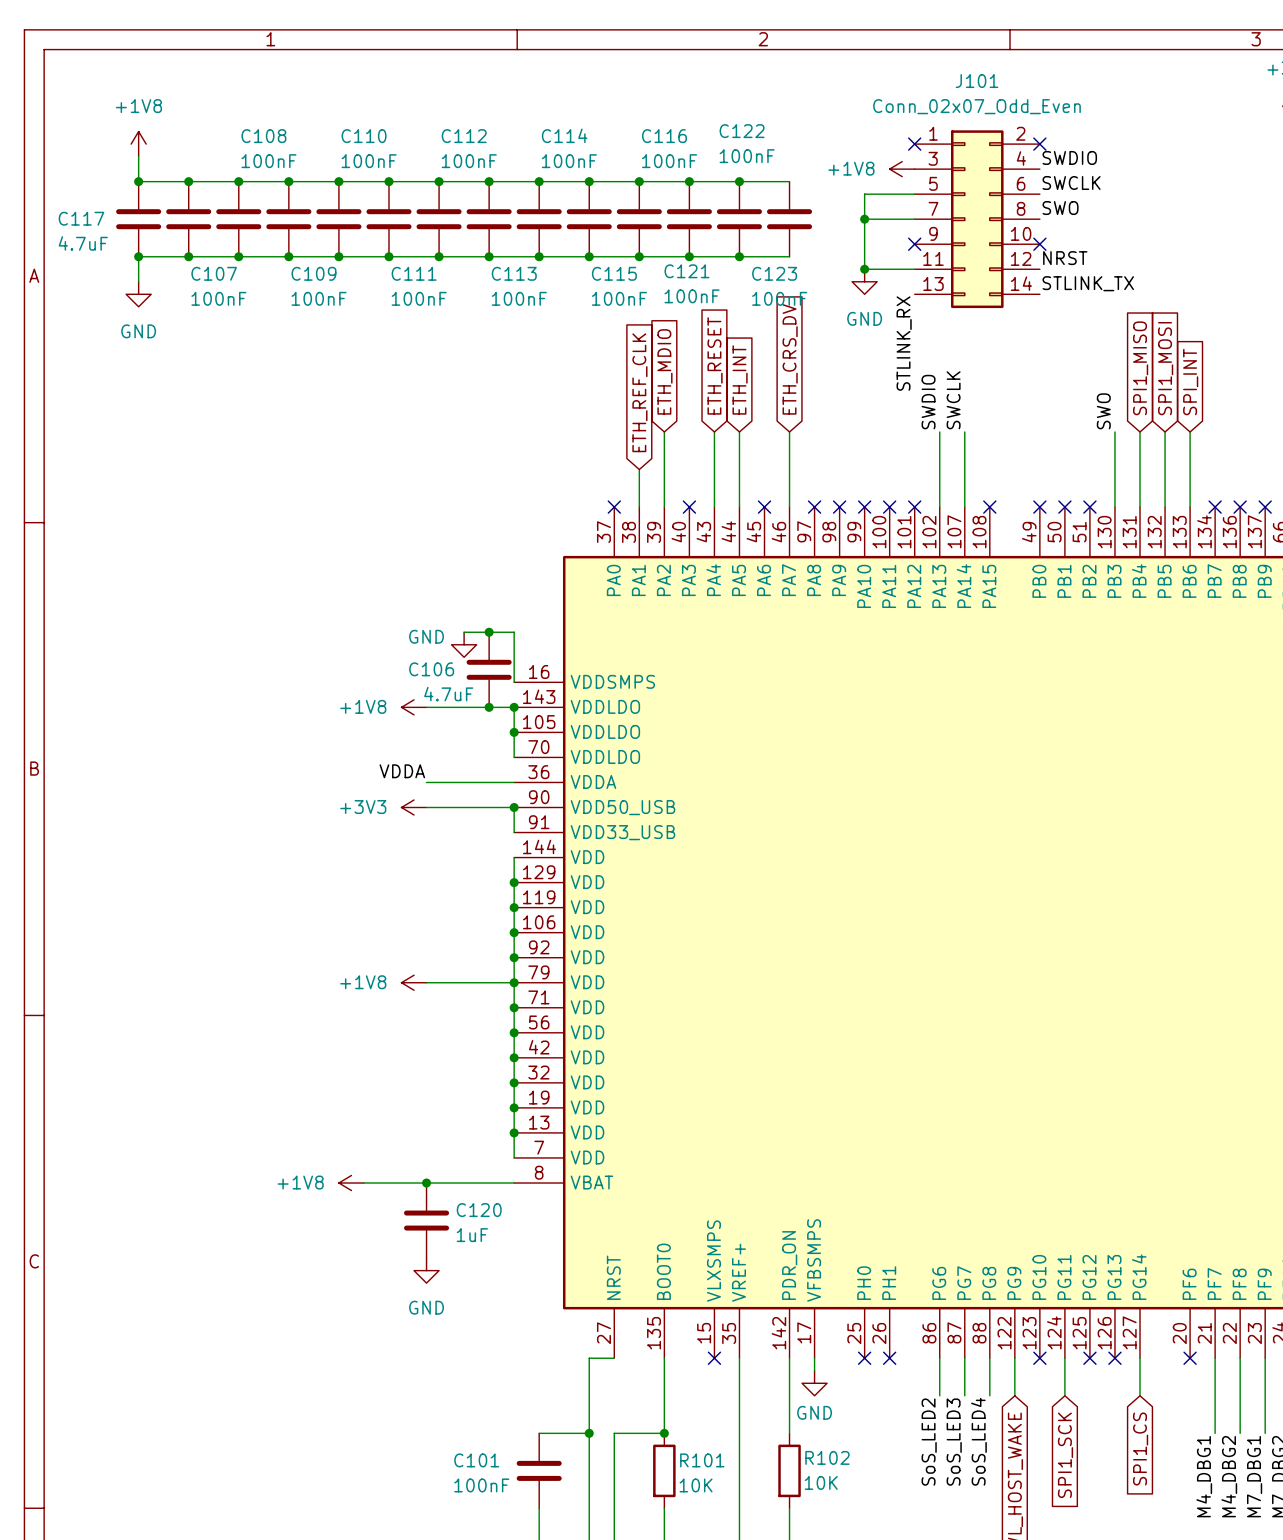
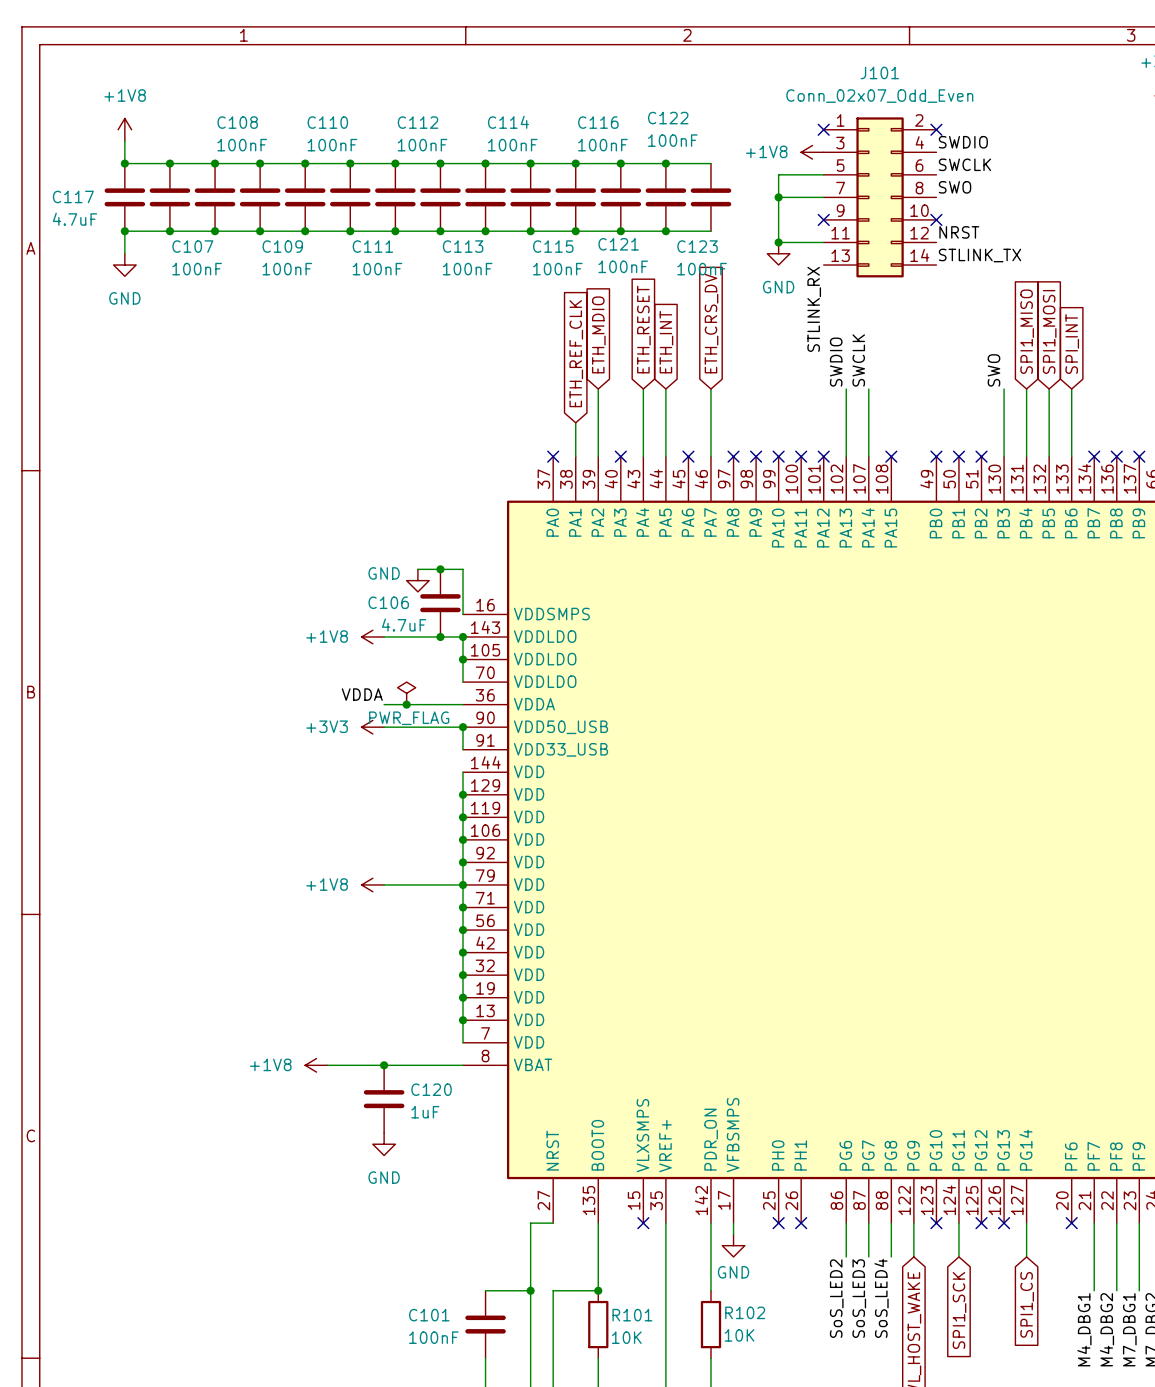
power symbol: none -> PWR_FLAG (406, 693)
junction: none -> (406, 704)

